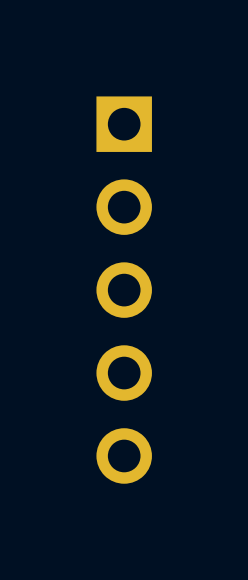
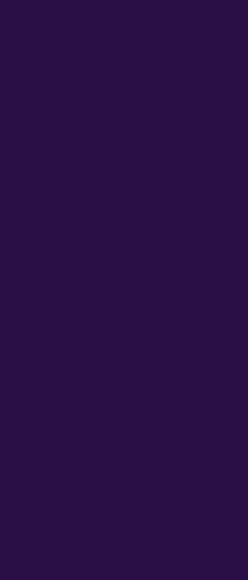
part: (124, 290) -> none

